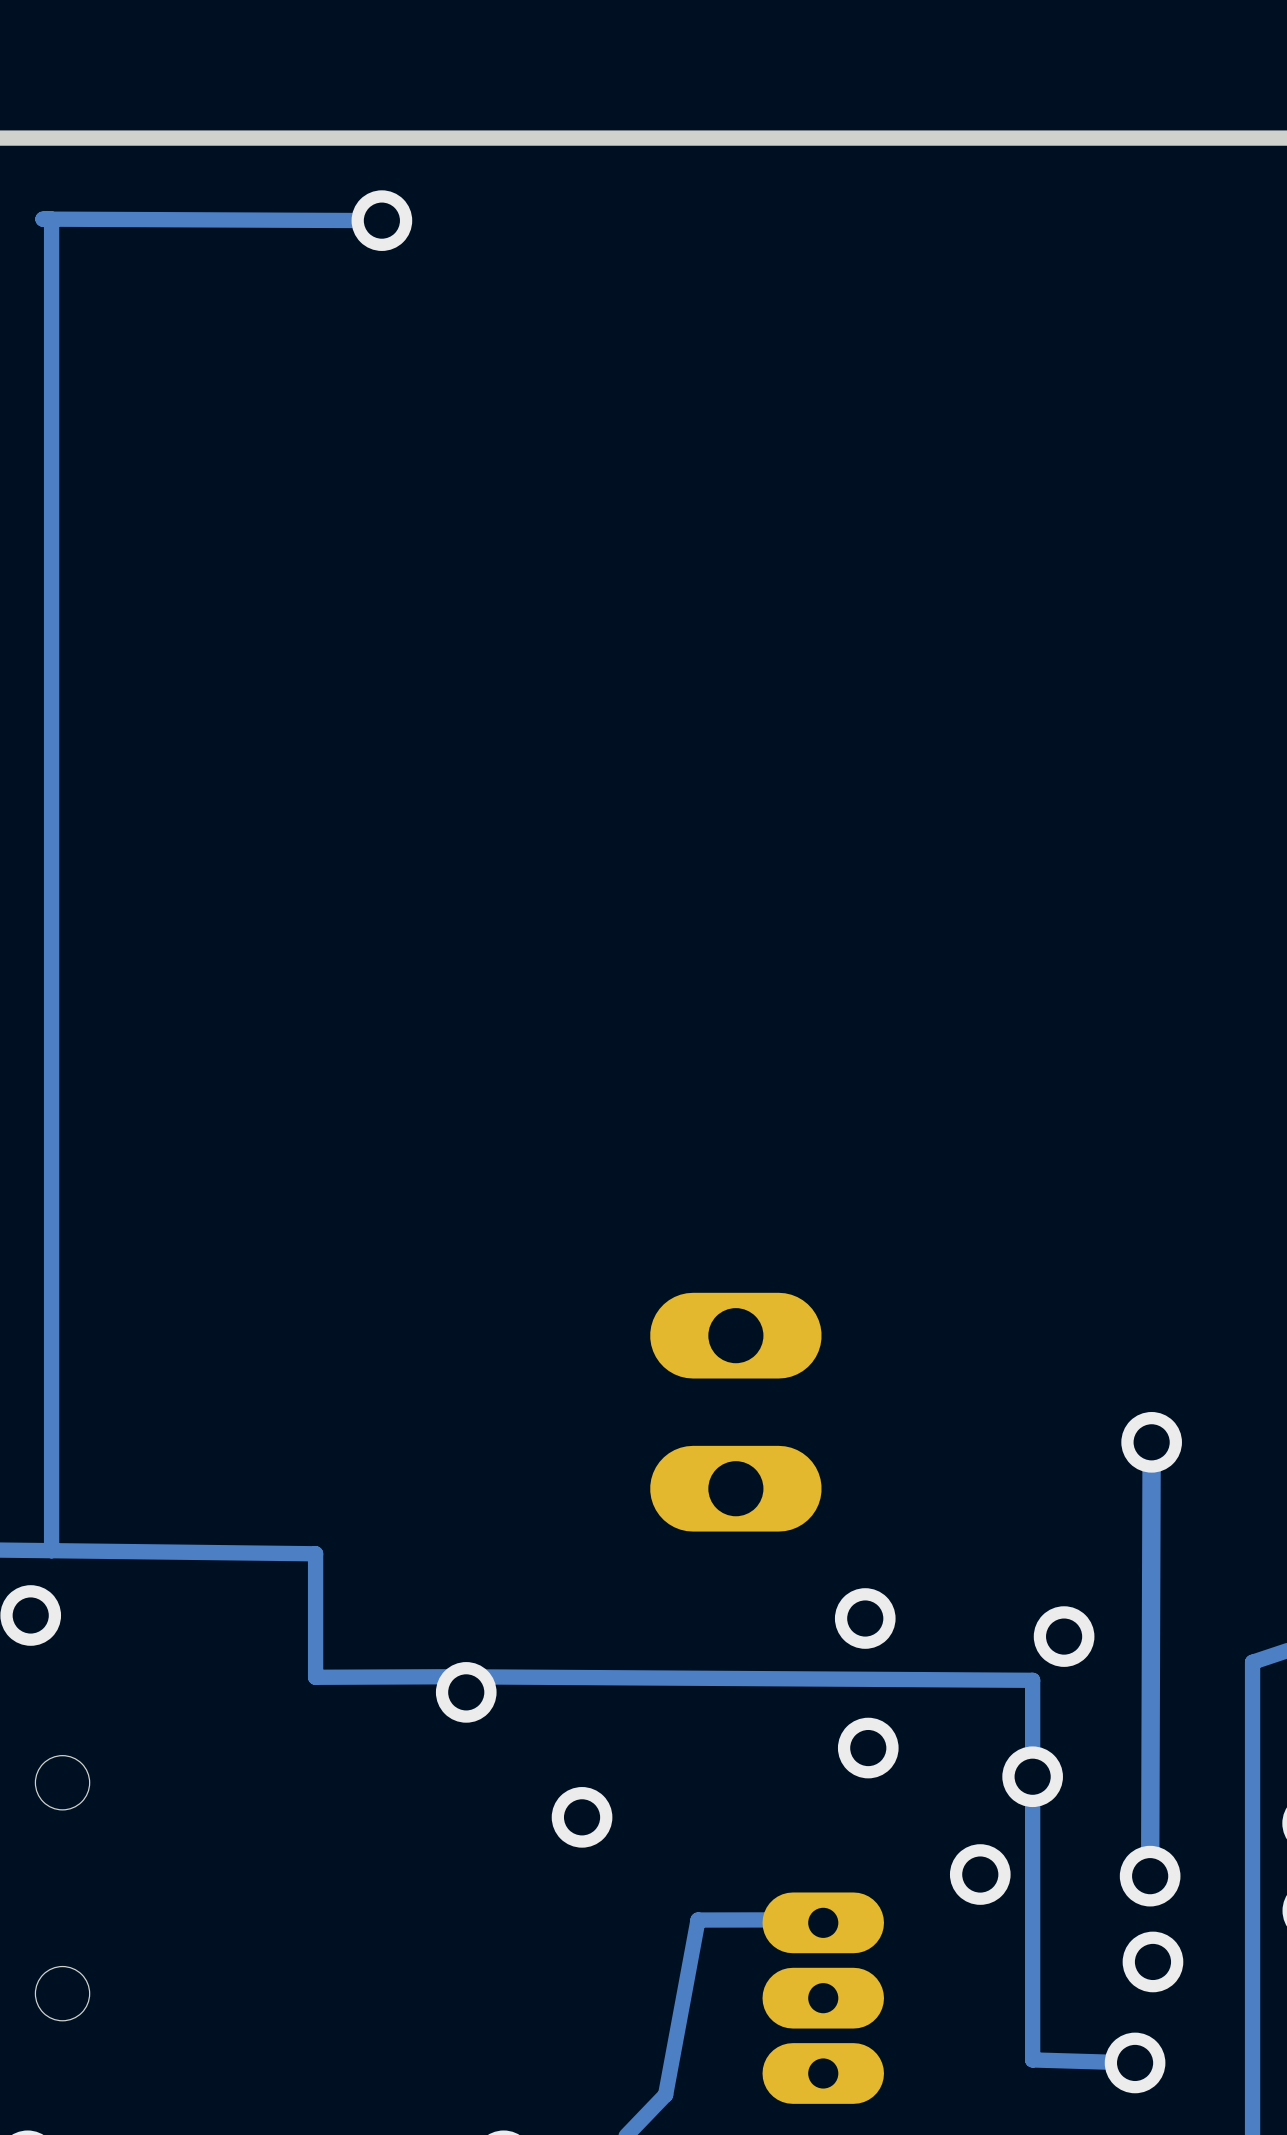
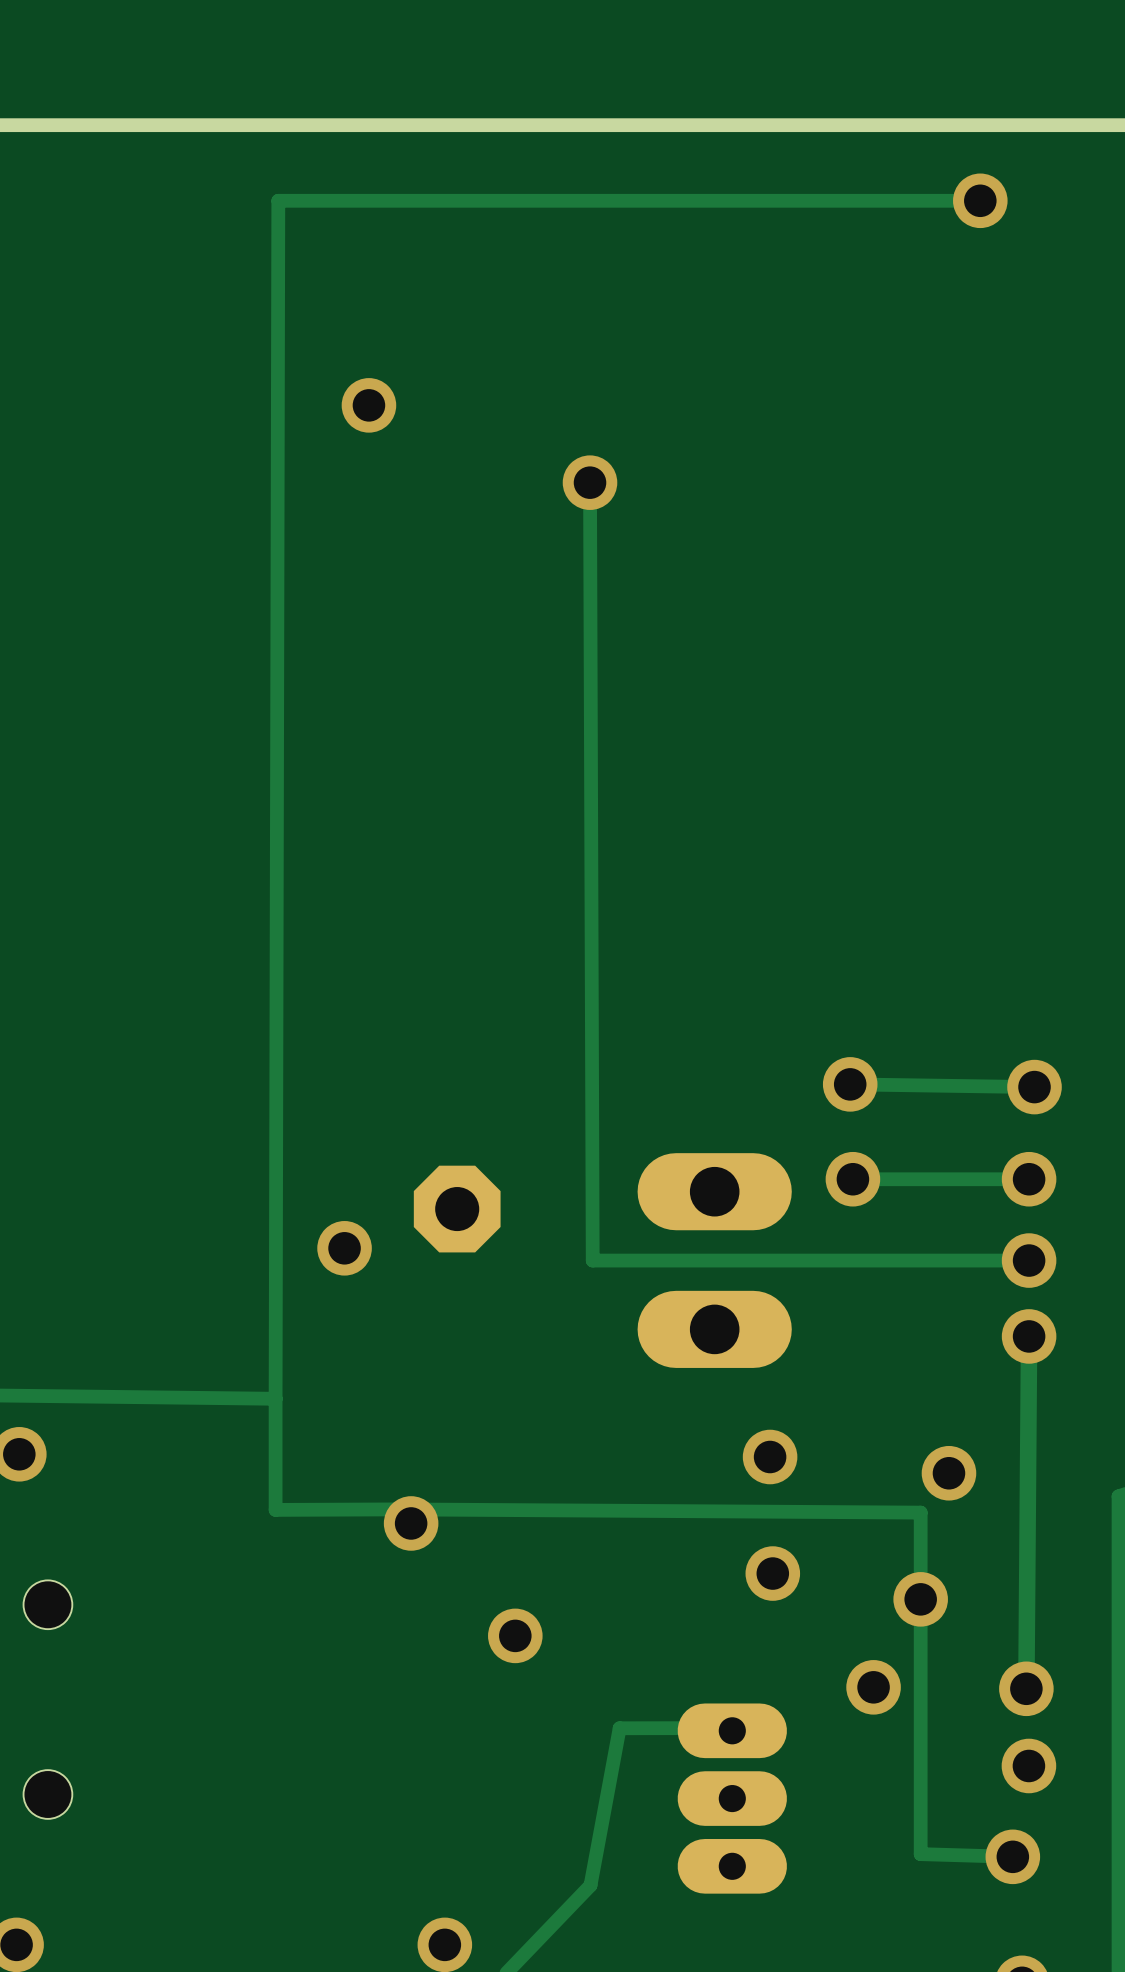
track: (381, 220) (42, 219) (51, 219) (51, 1550) -> none
via: (381, 220) -> none
track: none -> (980, 200) (278, 200) (275, 1398)
via: none -> (980, 200)
via: none -> (368, 405)
track: none -> (590, 482) (592, 1260) (1029, 1260)
via: none -> (590, 482)
track: none -> (850, 1084) (1034, 1087)
via: none -> (850, 1084)
via: none -> (1034, 1087)
via: none -> (852, 1179)
track: none -> (1029, 1179) (852, 1179)
via: none -> (1029, 1179)
part: none -> (457, 1209)
via: none -> (344, 1248)
via: none -> (1029, 1260)
part position: (735, 1412) -> (714, 1260)
track: (1151, 1442) (1150, 1876) -> (1029, 1336) (1026, 1688)
via: (1151, 1442) -> none
via: none -> (1029, 1336)

